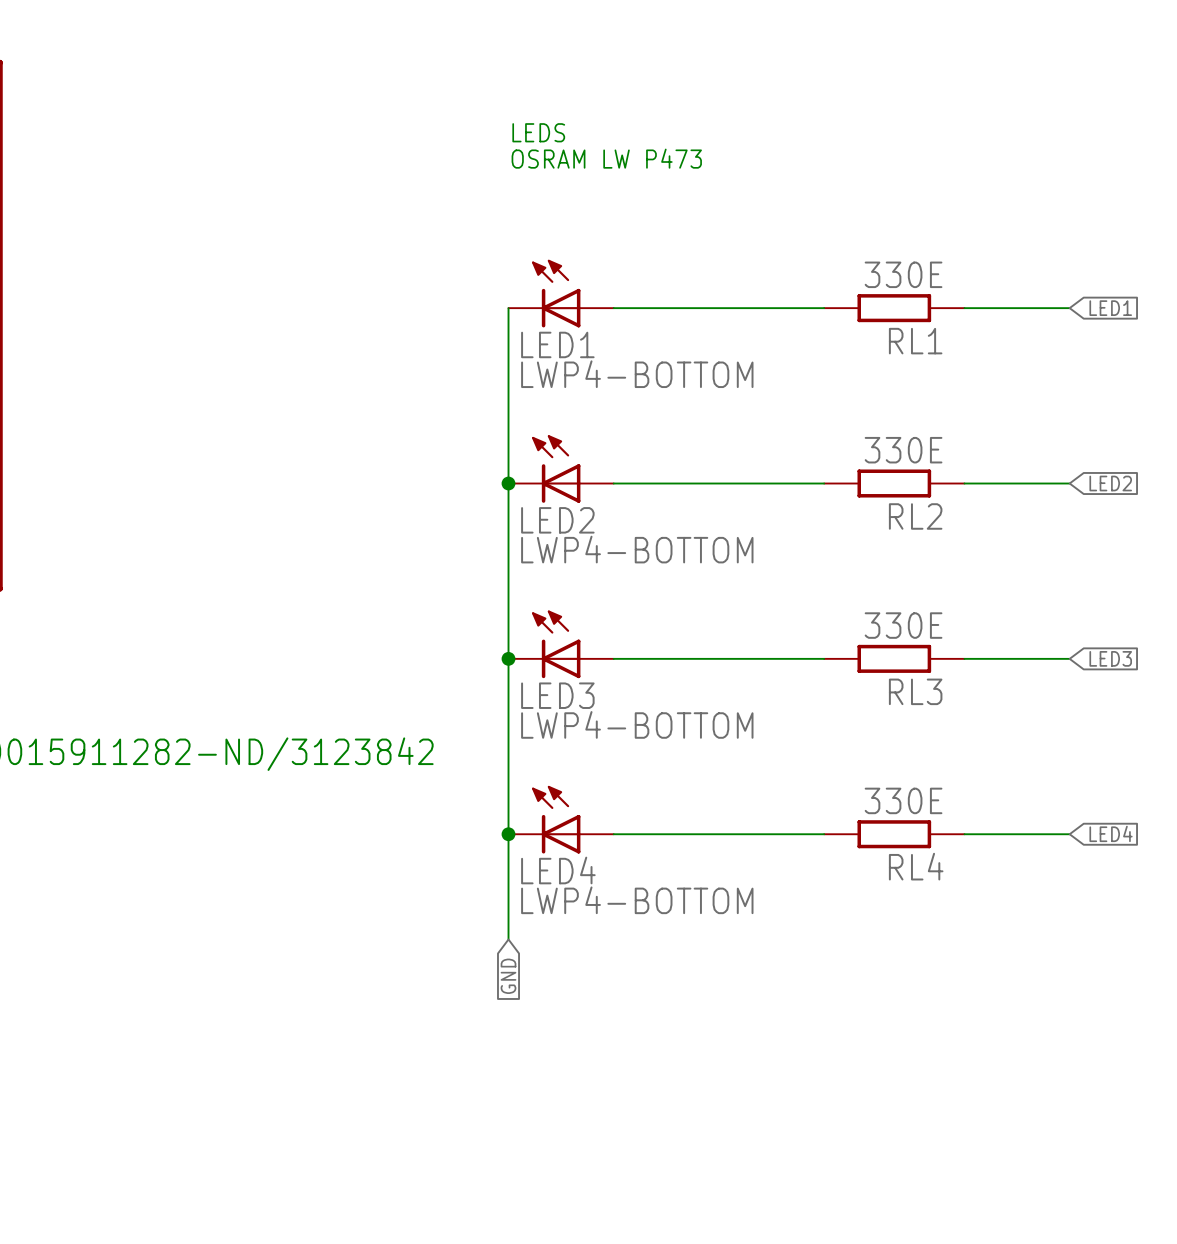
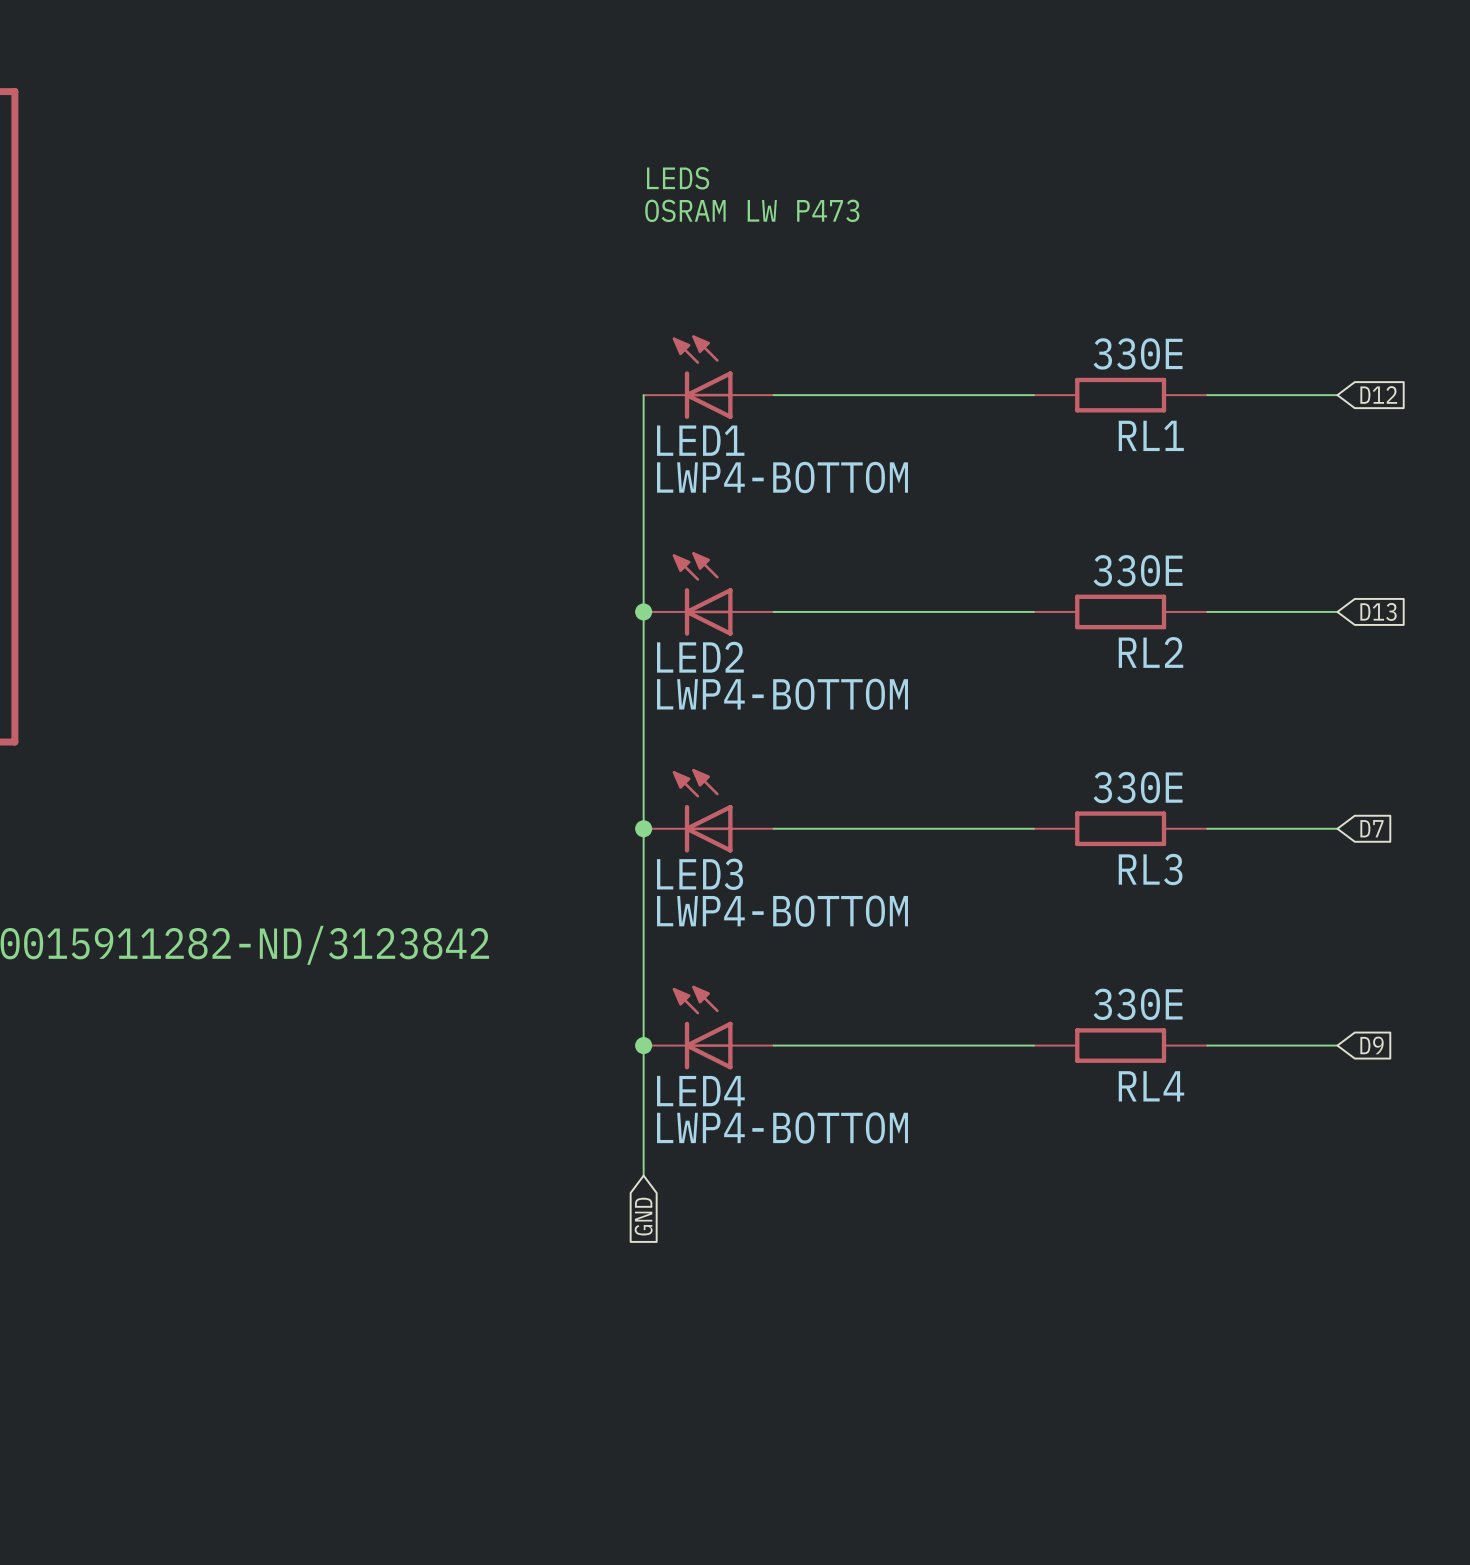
global label: LED1 (1110, 308) -> D12 (1378, 394)
global label: LED2 (1110, 483) -> D13 (1378, 611)
global label: LED3 (1110, 658) -> D7 (1371, 828)
global label: LED4 (1111, 833) -> D9 (1372, 1045)

